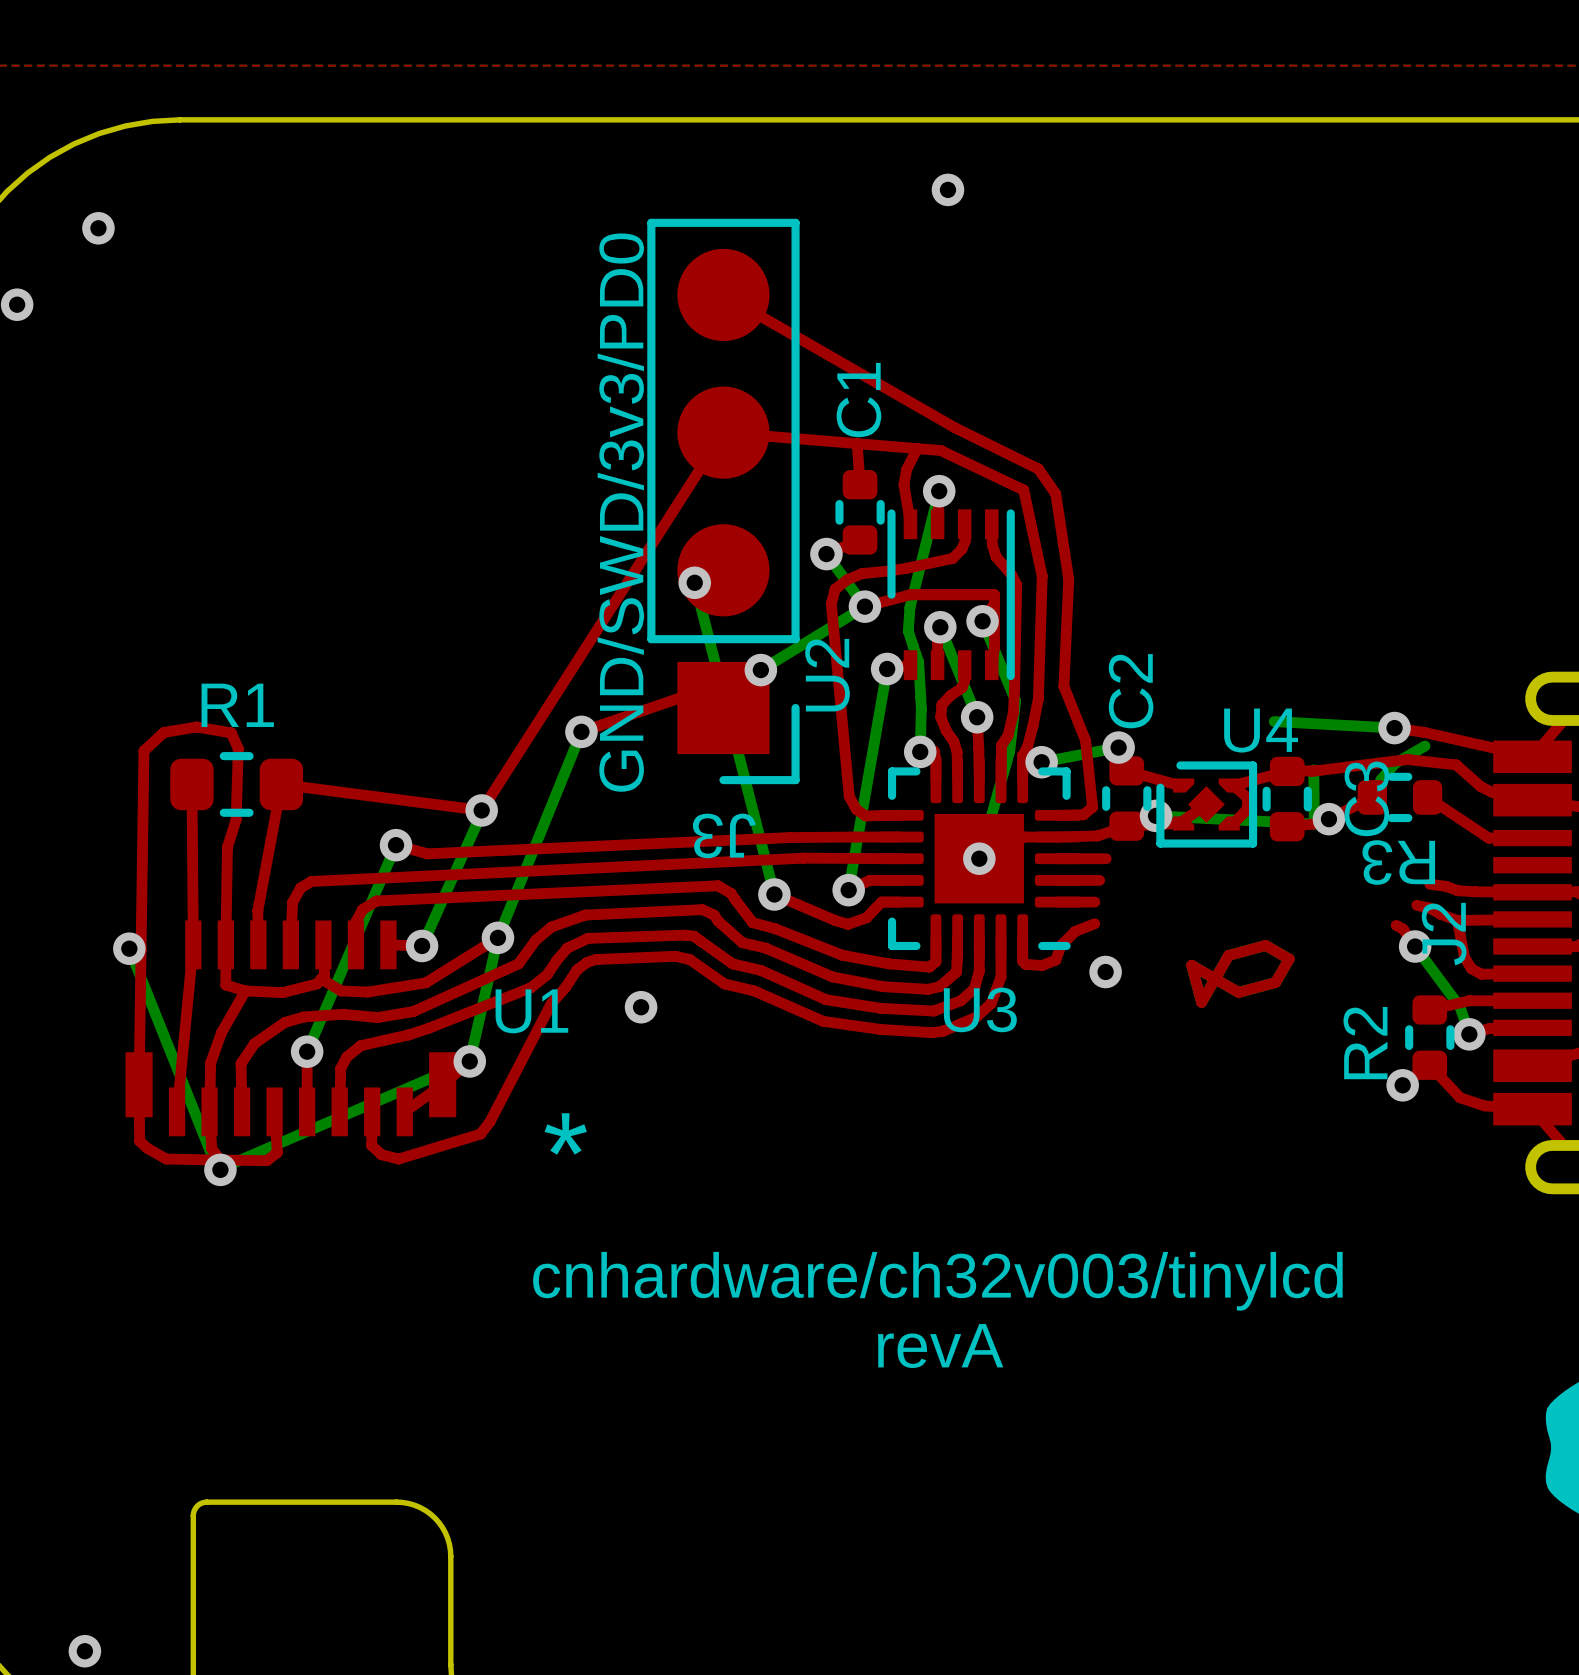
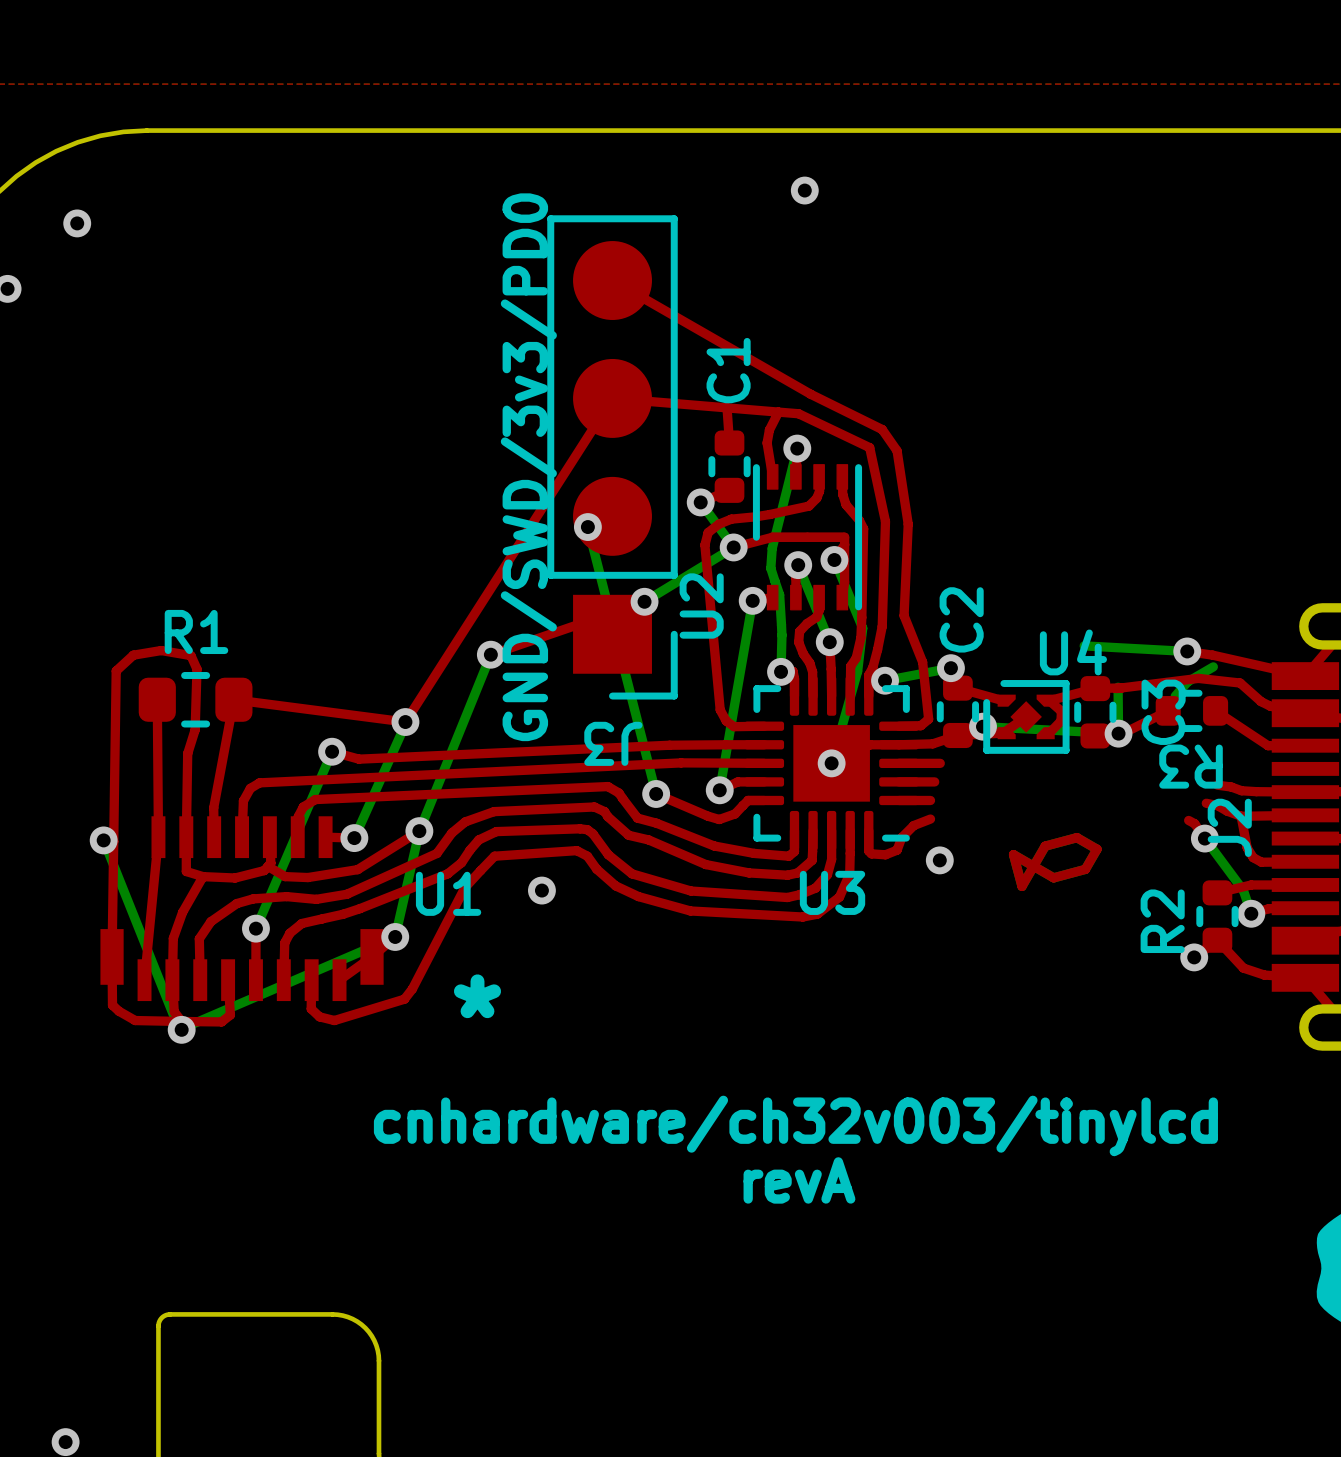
via position: (1328, 819) -> (1118, 733)
top track: (700, 941) (732, 963) (760, 970) (825, 999) (880, 1008) (933, 1011) (960, 1000) (974, 988) -> (593, 833) (608, 854) (632, 873) (690, 891) (787, 897) (815, 888) (827, 874)
top track: (1001, 963) (1001, 976) (991, 1003) (976, 1016) (943, 1031) (932, 1032) (880, 1029) (823, 1021) (754, 990) (724, 983) (689, 959) (675, 956) (596, 959) (587, 962) (577, 969) (551, 1003) -> (850, 853) (849, 873) (839, 897) (817, 914) (802, 917) (690, 910) (638, 896) (615, 885) (596, 869) (587, 856) (576, 850) (494, 856) (464, 887)

